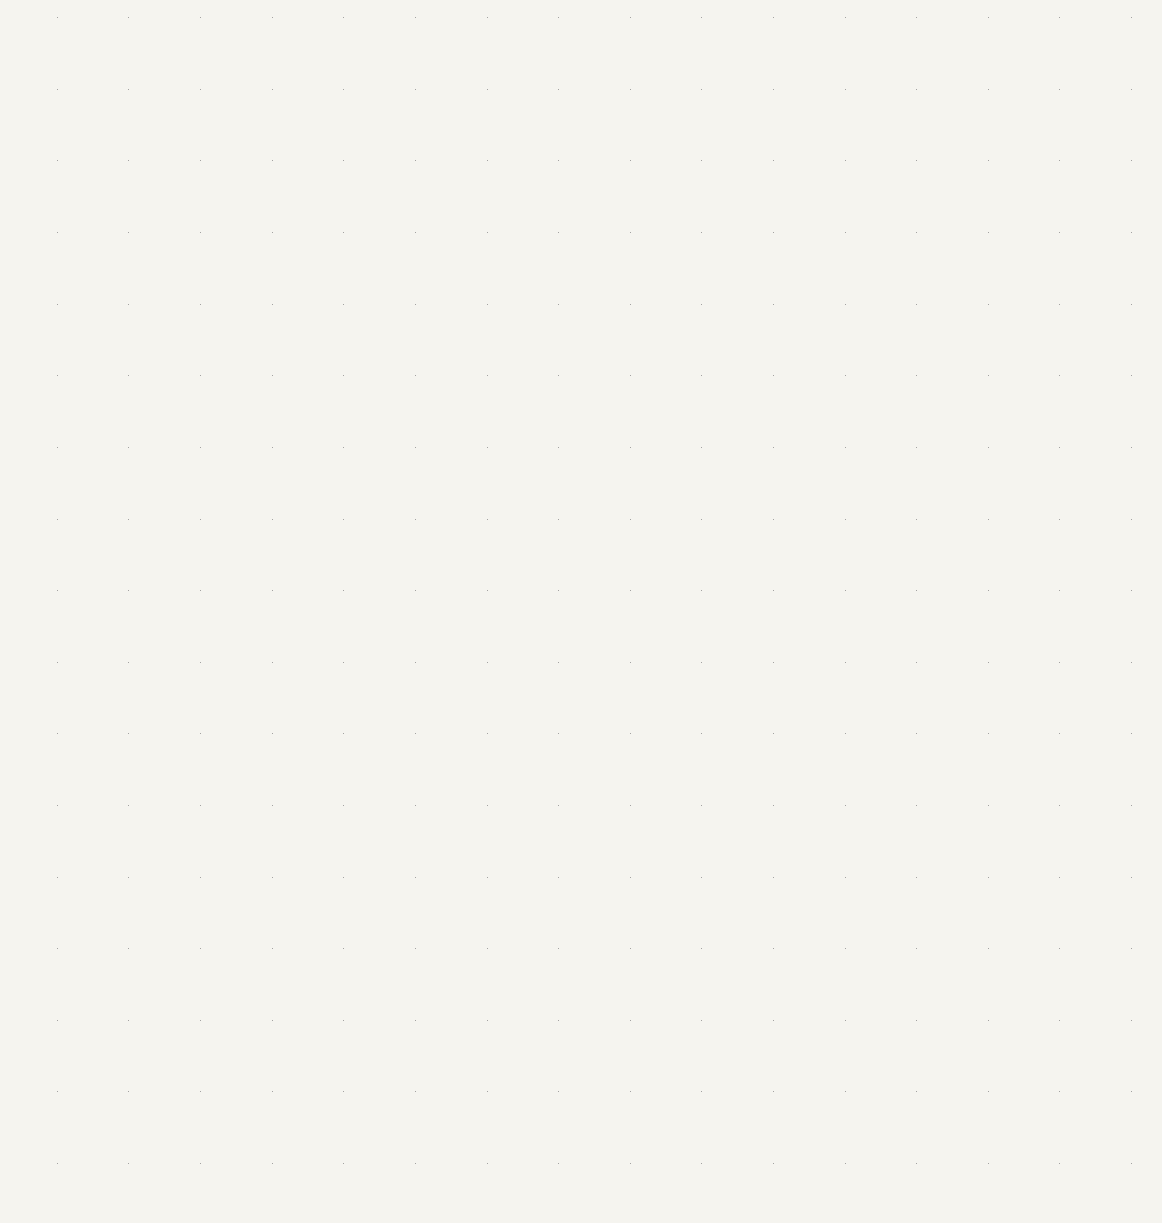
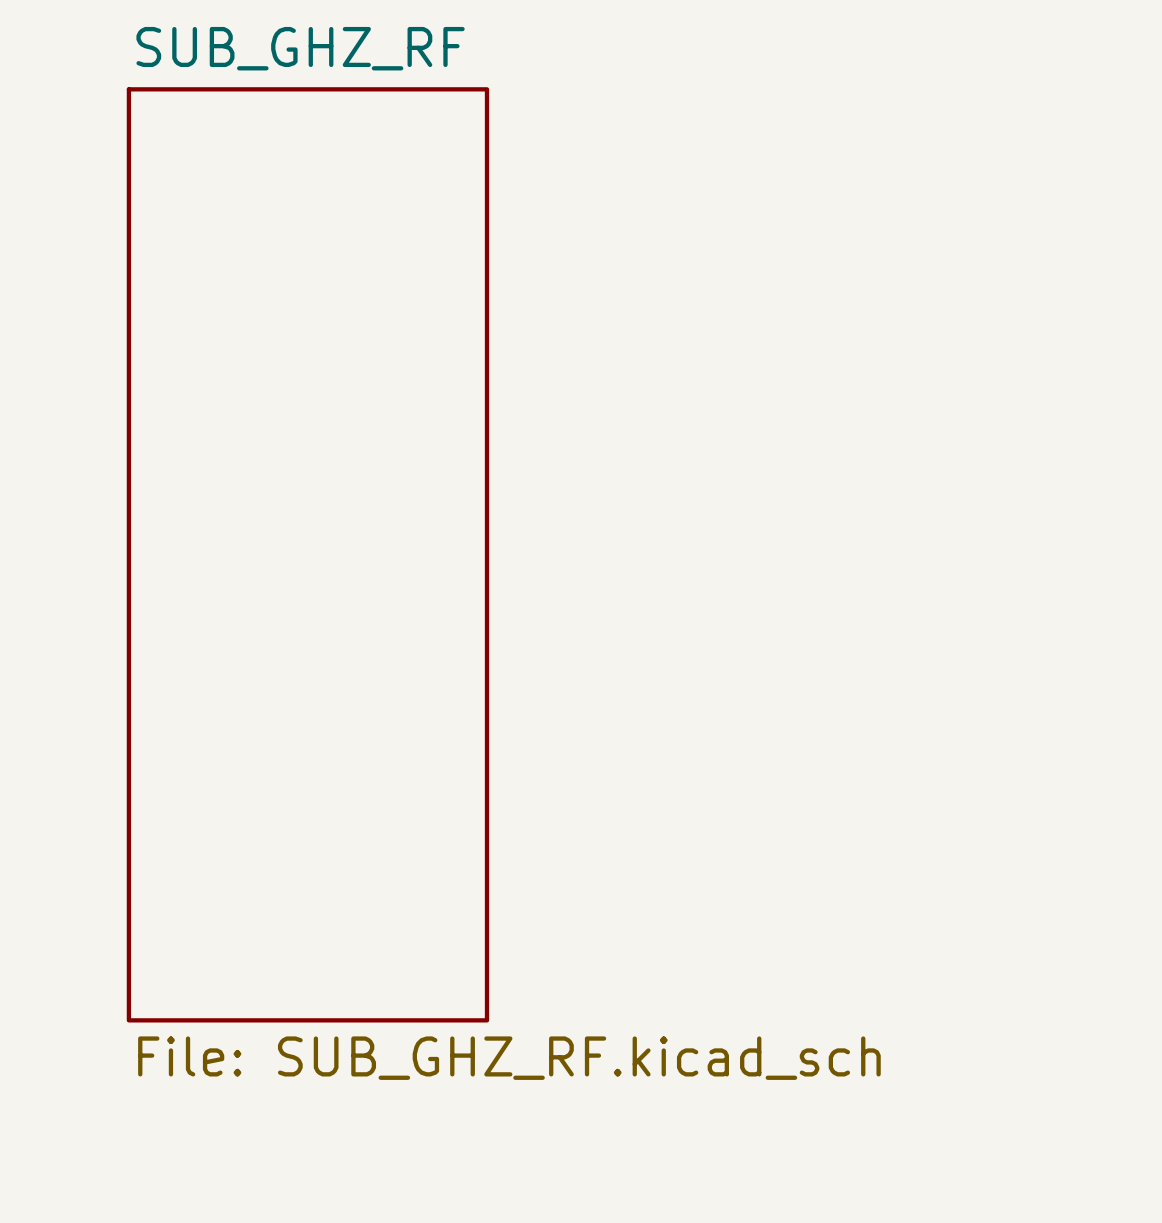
sheet SUB_GHZ_RF: none -> File: SUB_GHZ_RF.kicad_sch (307, 554)

